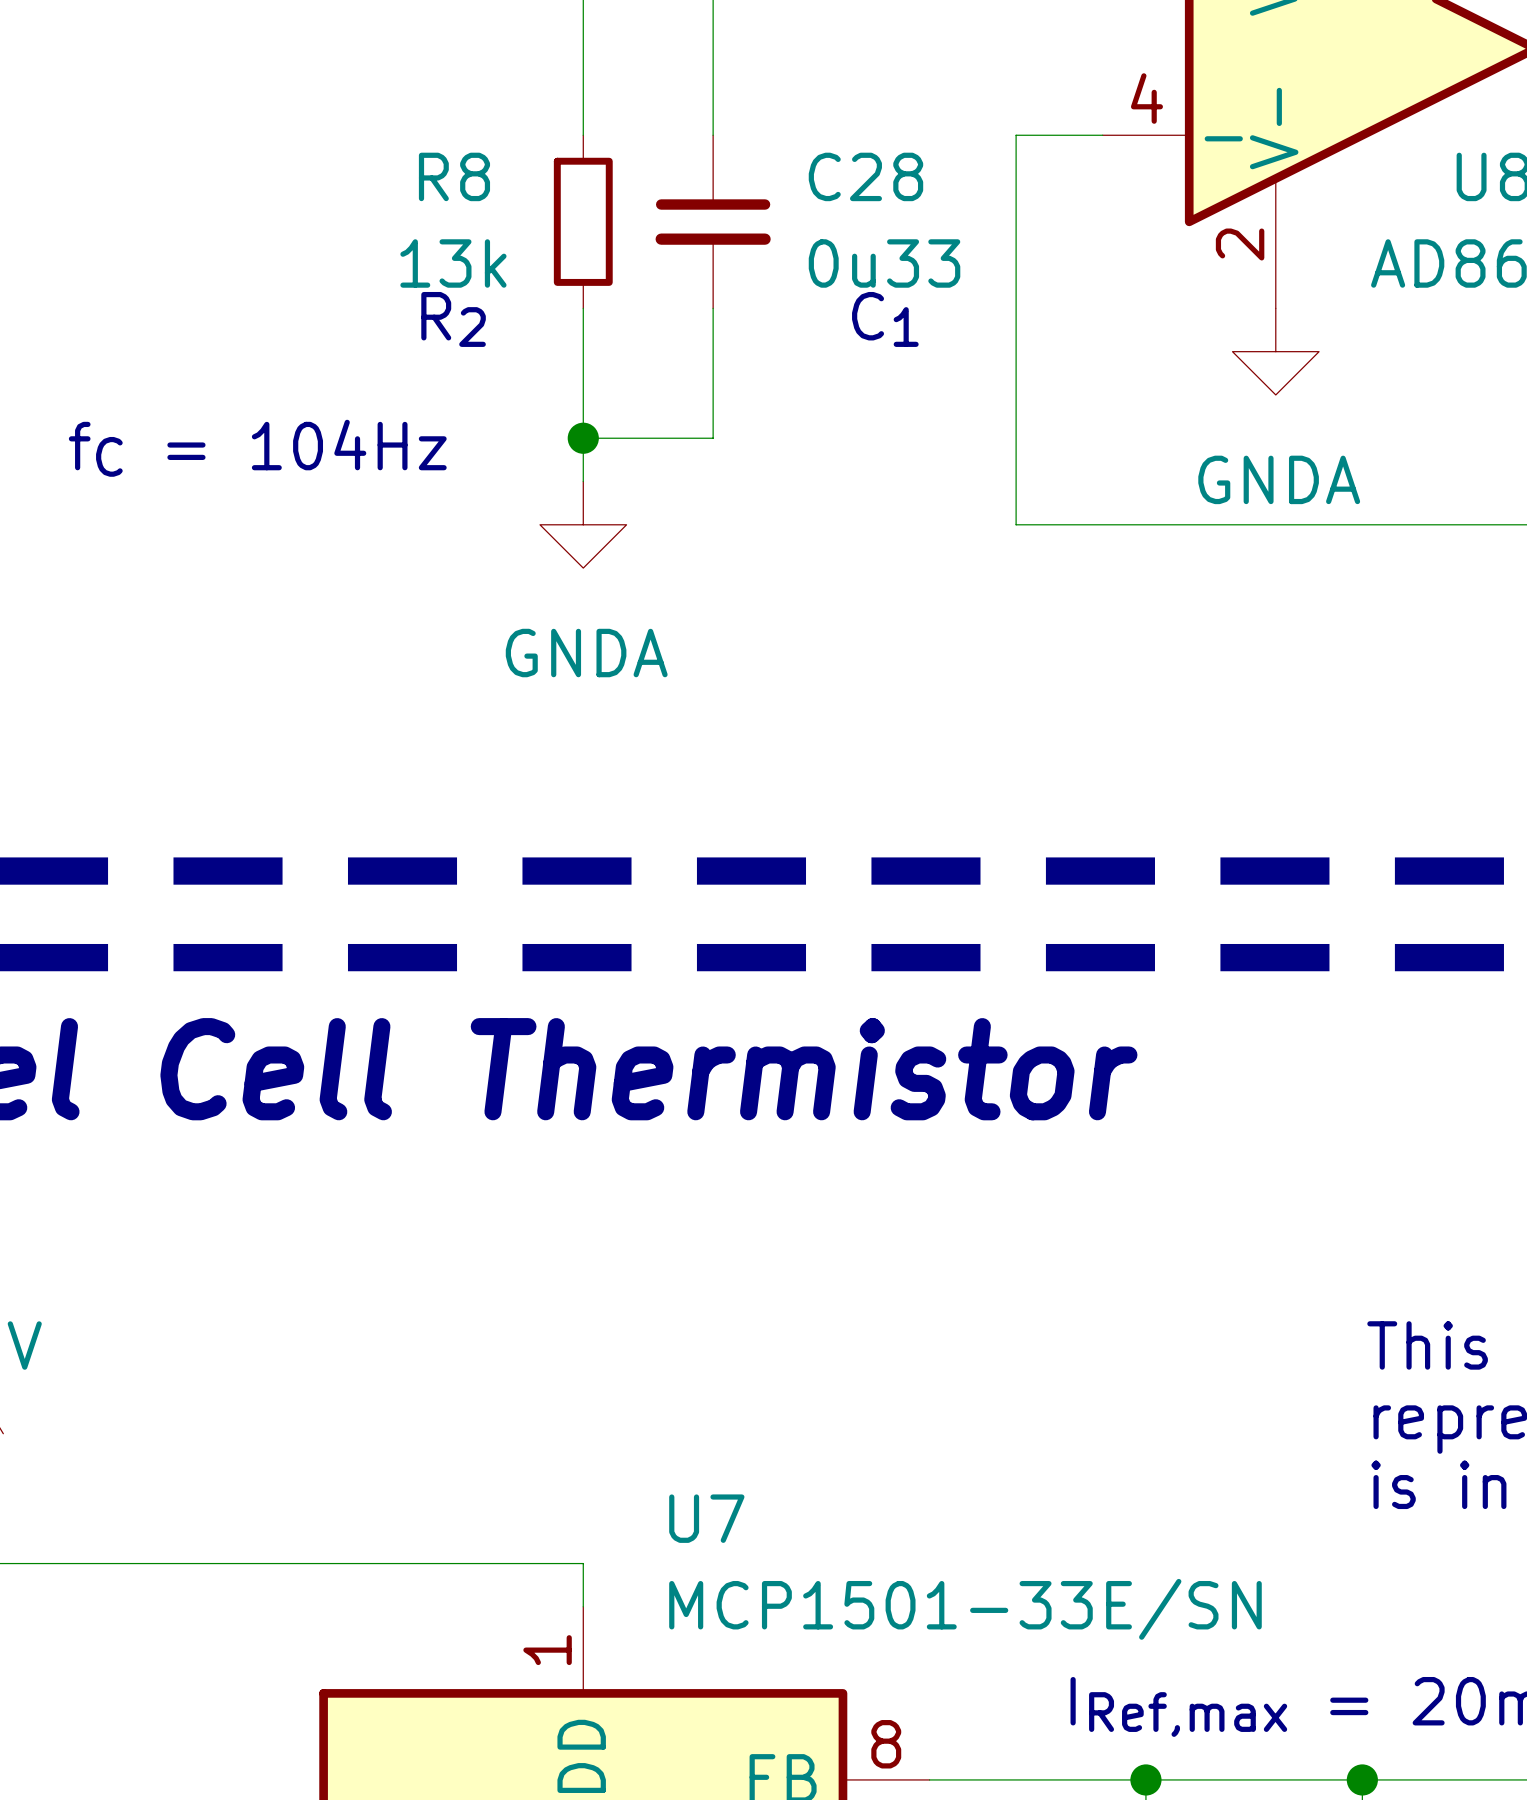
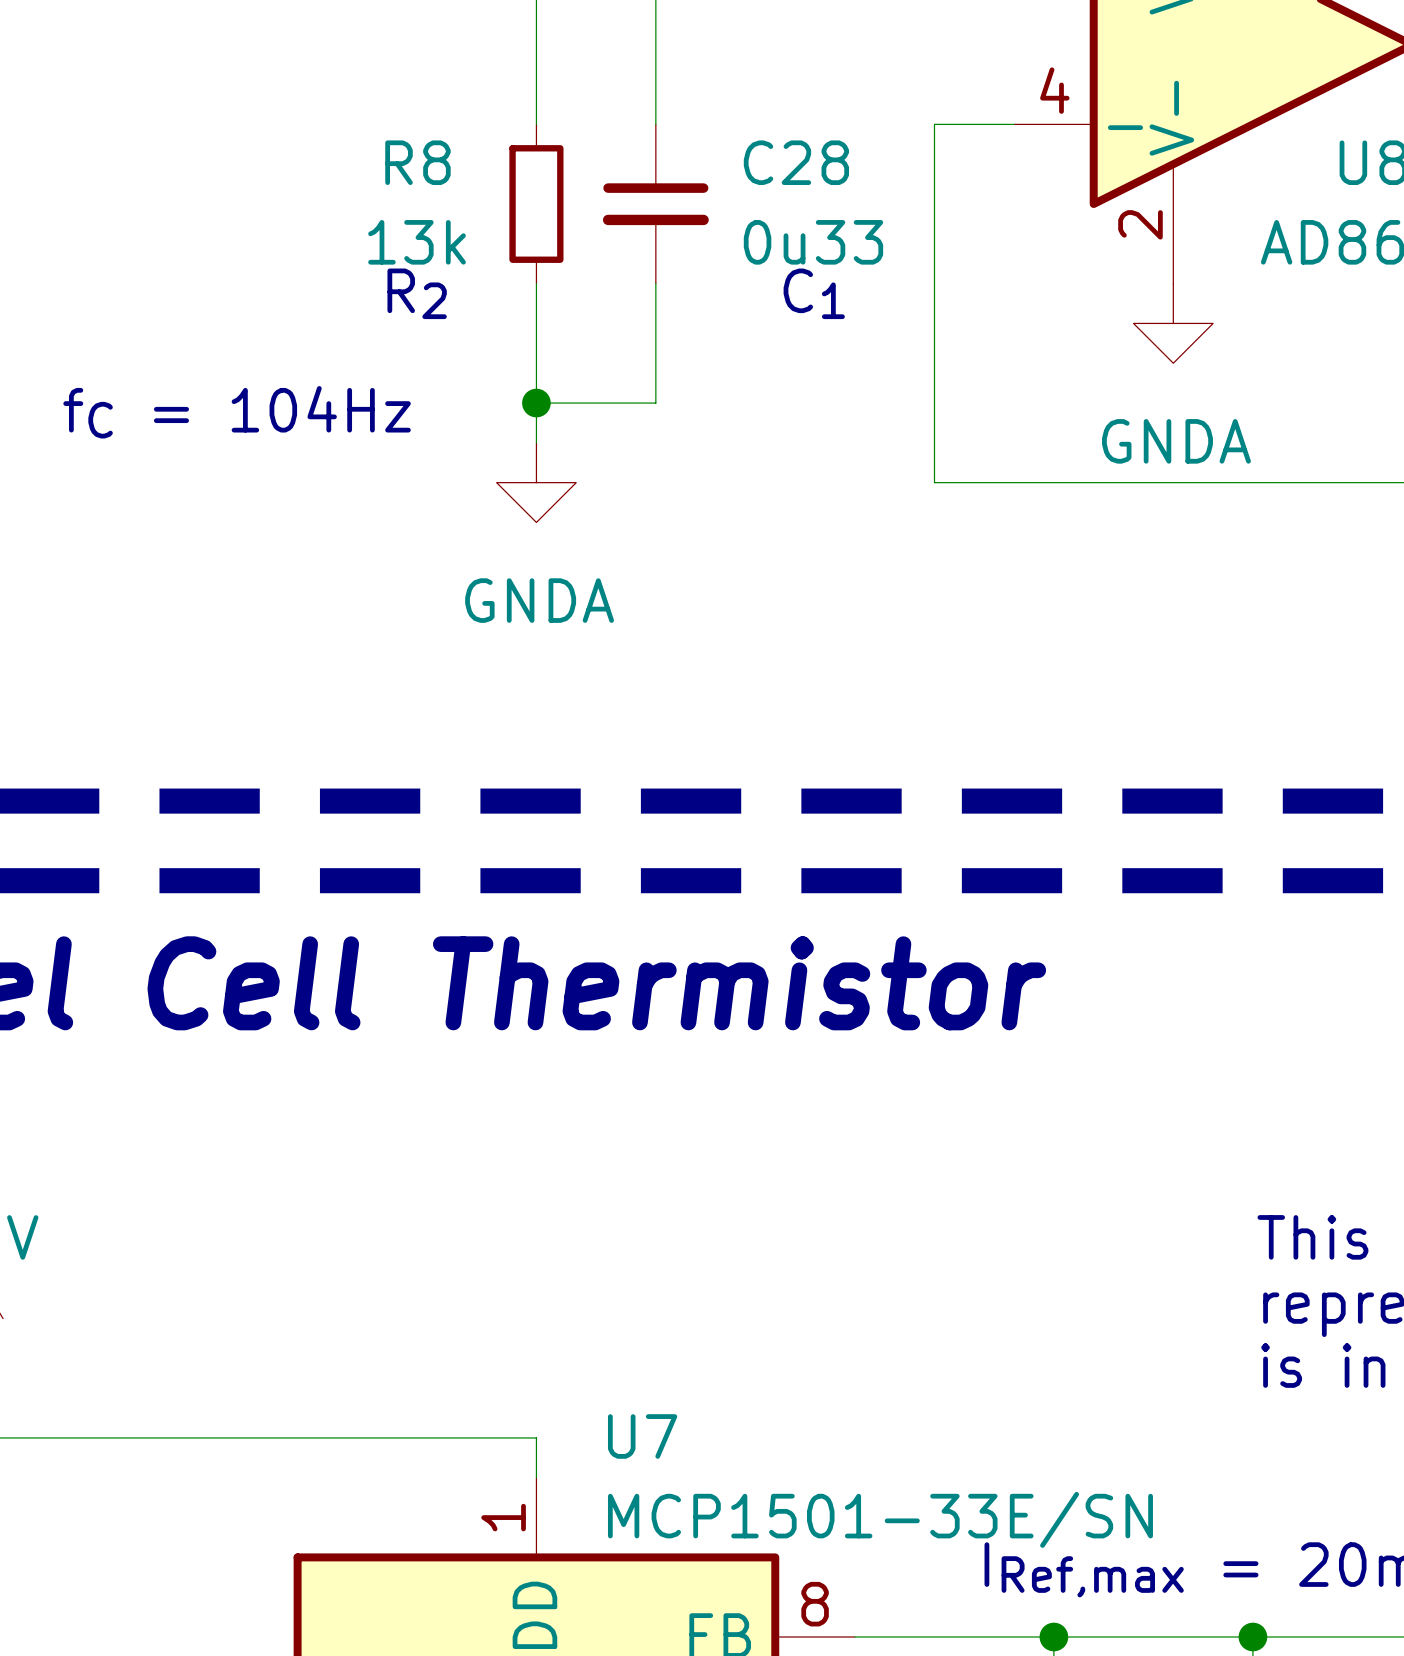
U7 name position: U7 (706, 1518) -> U7 (642, 1436)
U7 value position: MCP1501-33E/SN (965, 1609) -> MCP1501-33E/SN (880, 1519)

